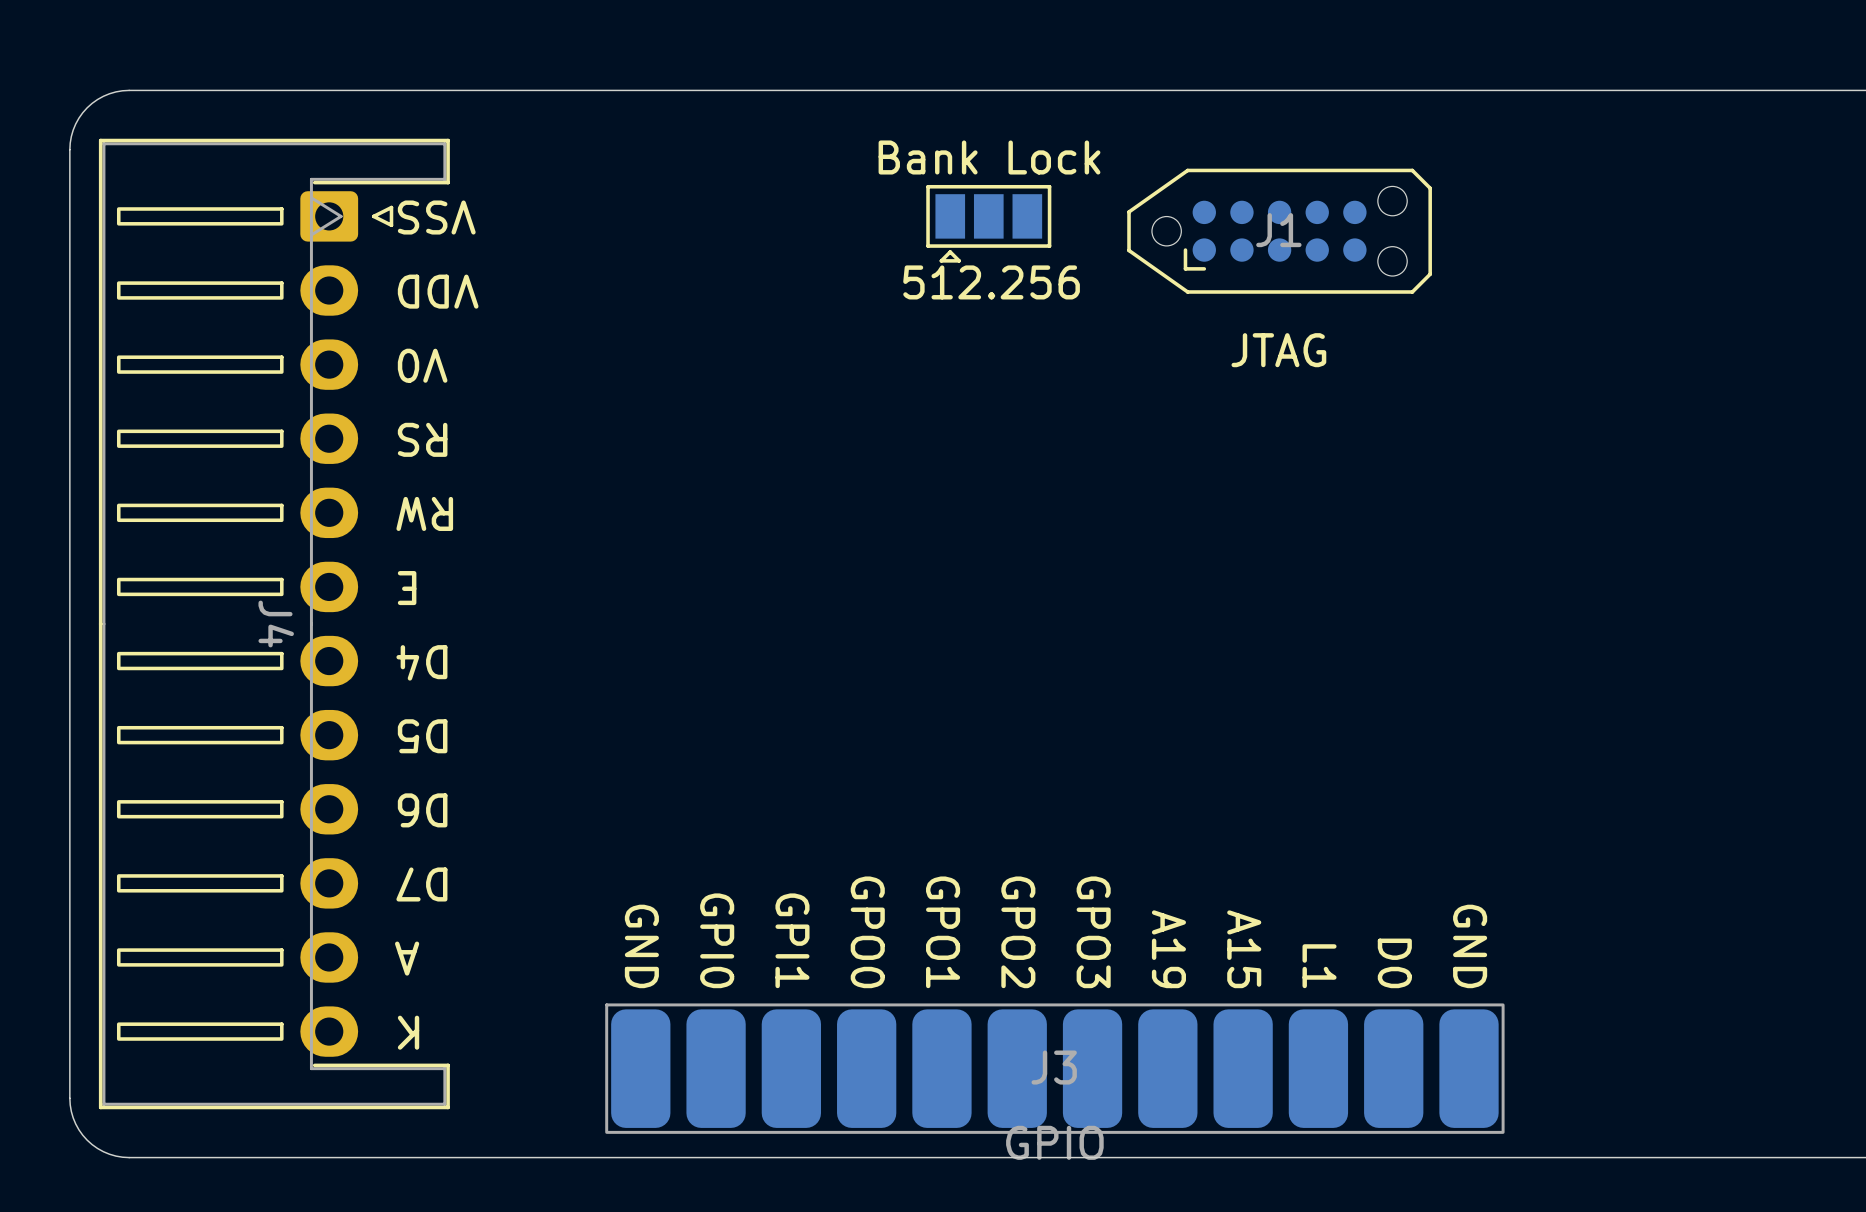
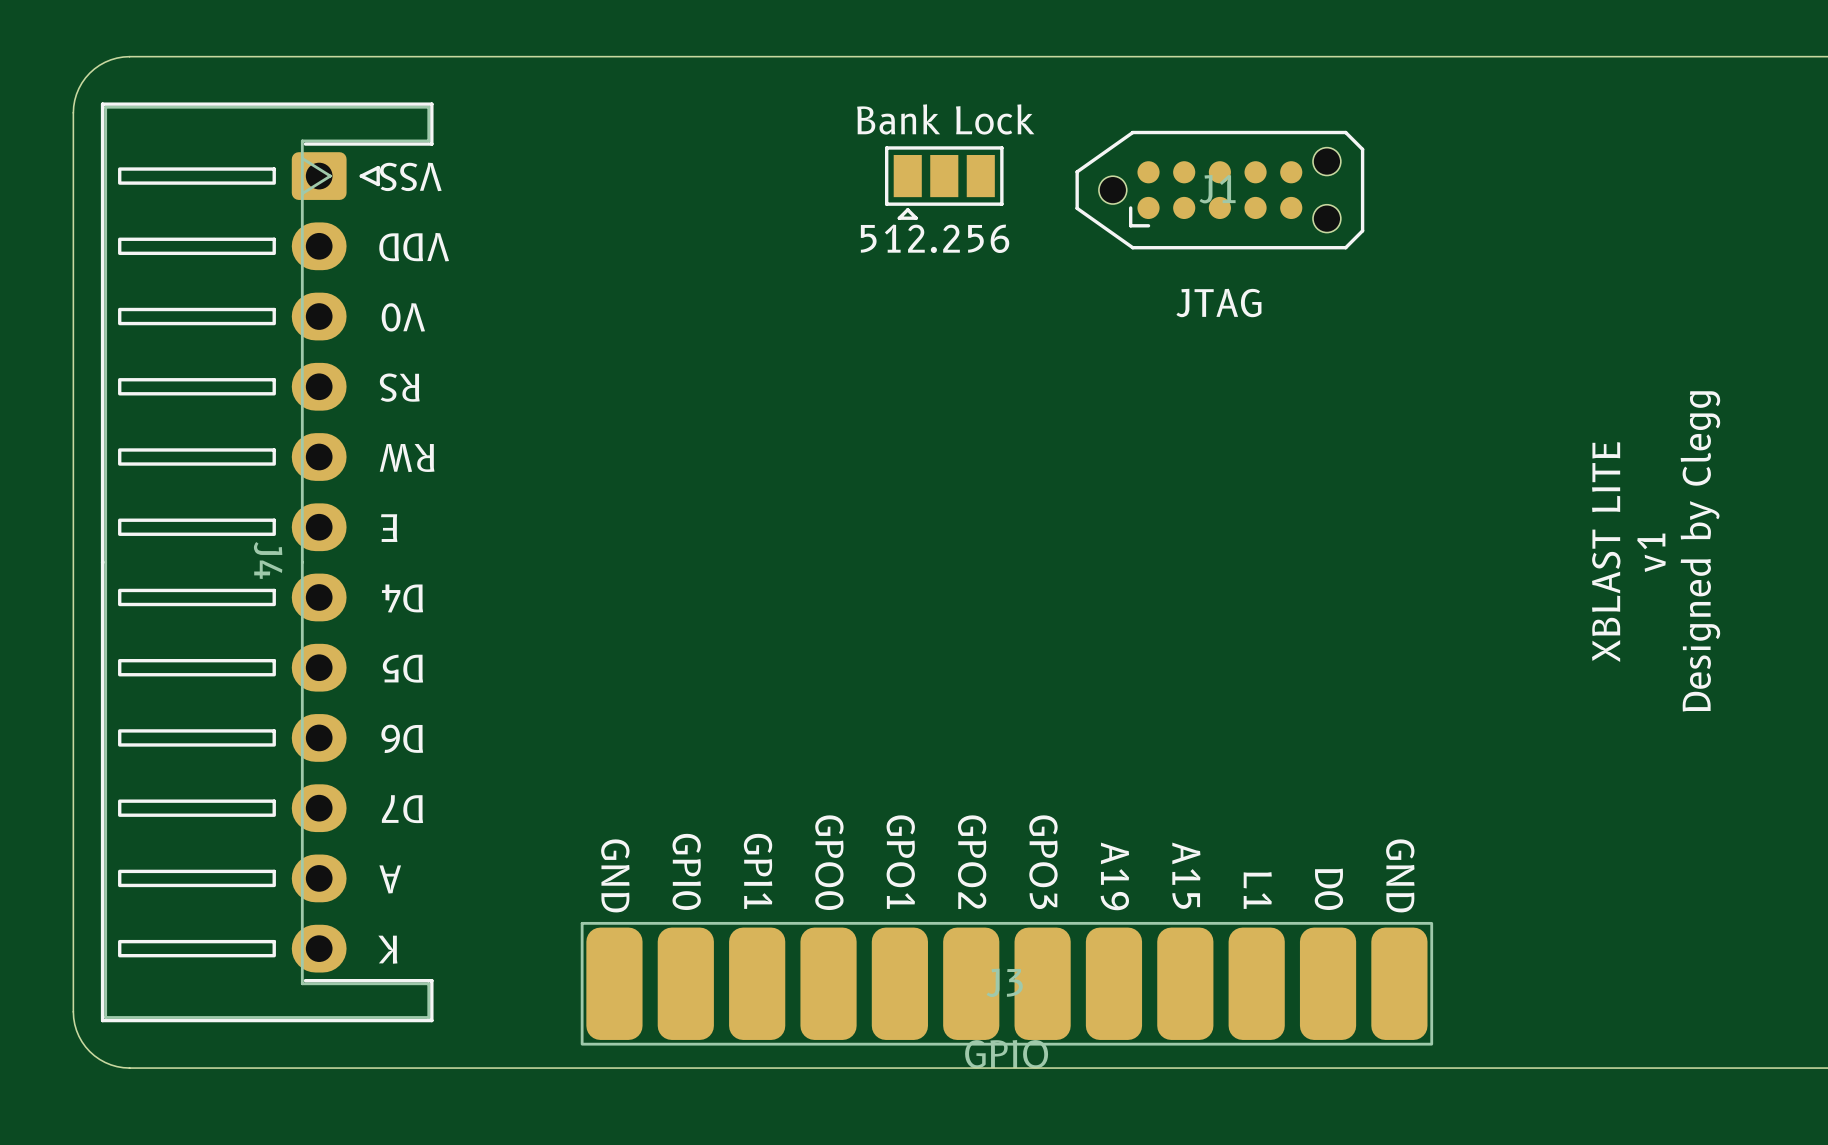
text: none -> XBLAST LITE (1606, 552)
text: none -> v1 (1651, 552)
text: none -> Designed by Clegg (1700, 551)

